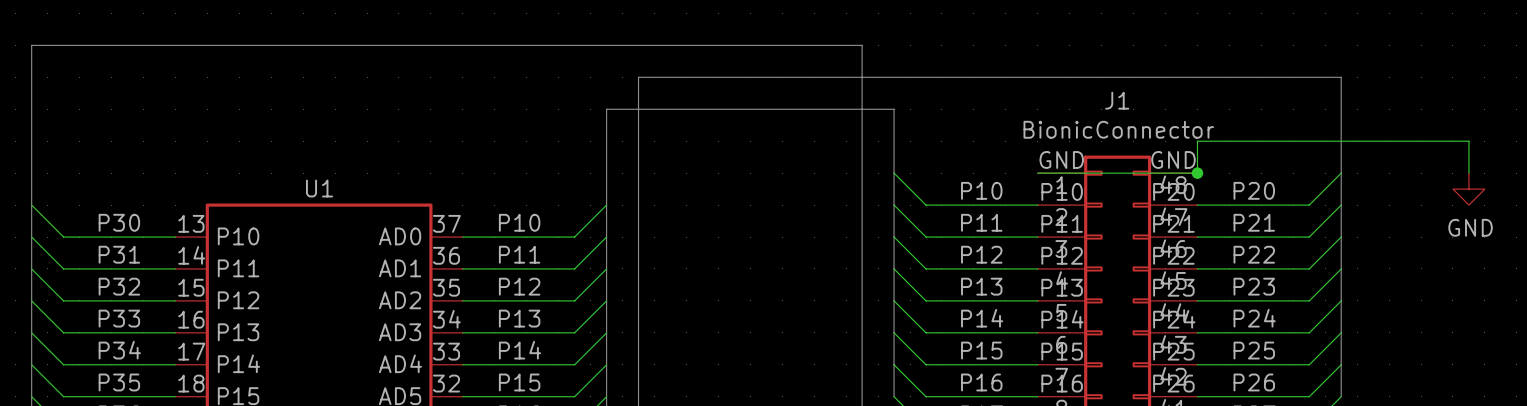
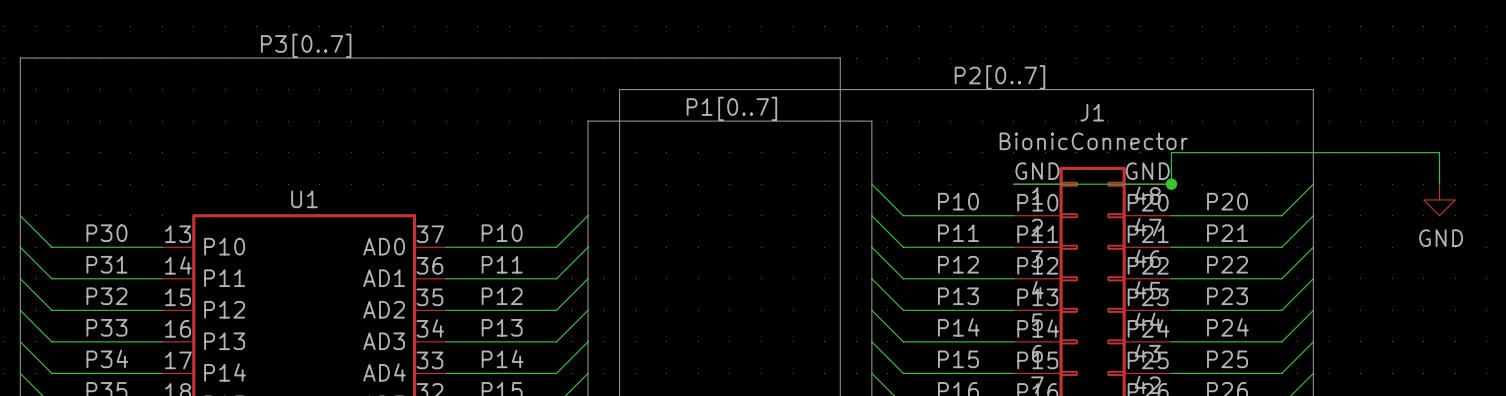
label: none -> P3[0..7] (306, 45)
label: none -> P2[0..7] (999, 77)
label: none -> P1[0..7] (731, 108)

